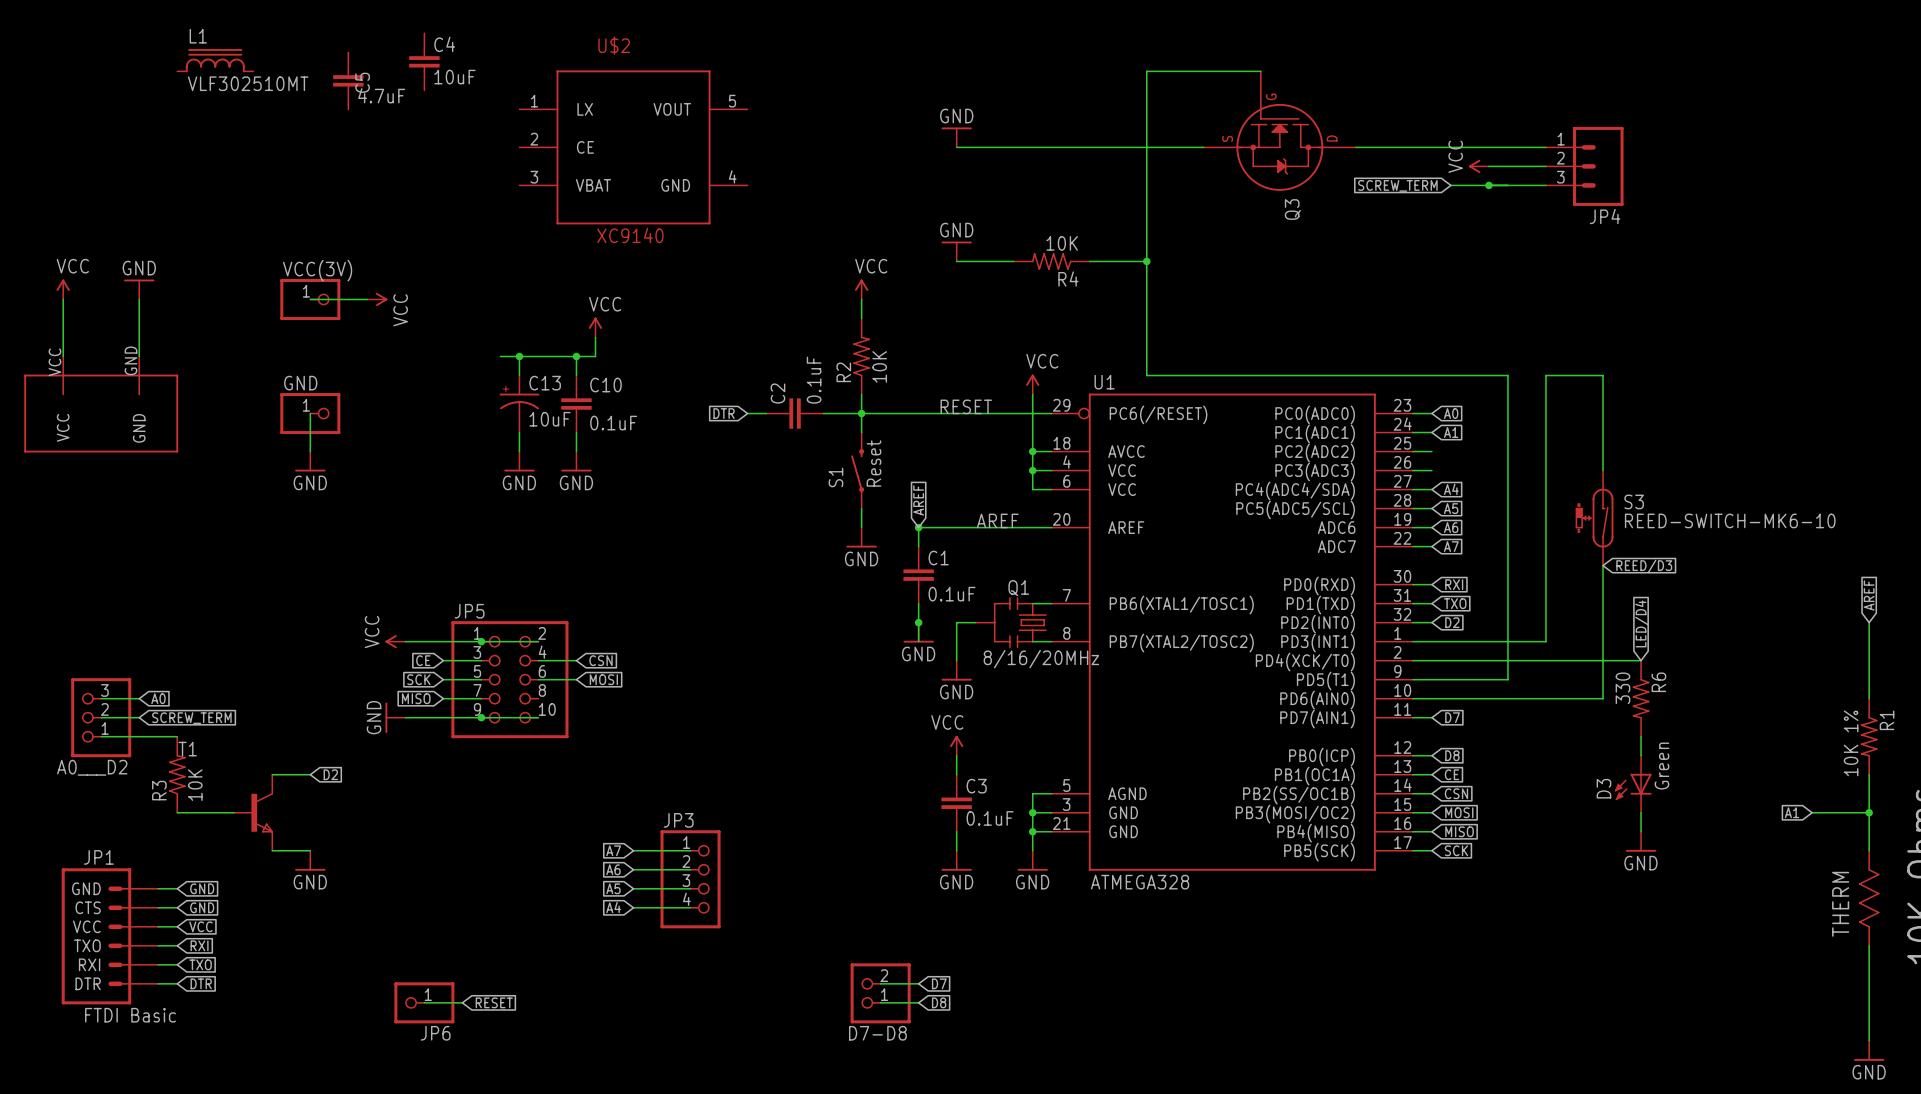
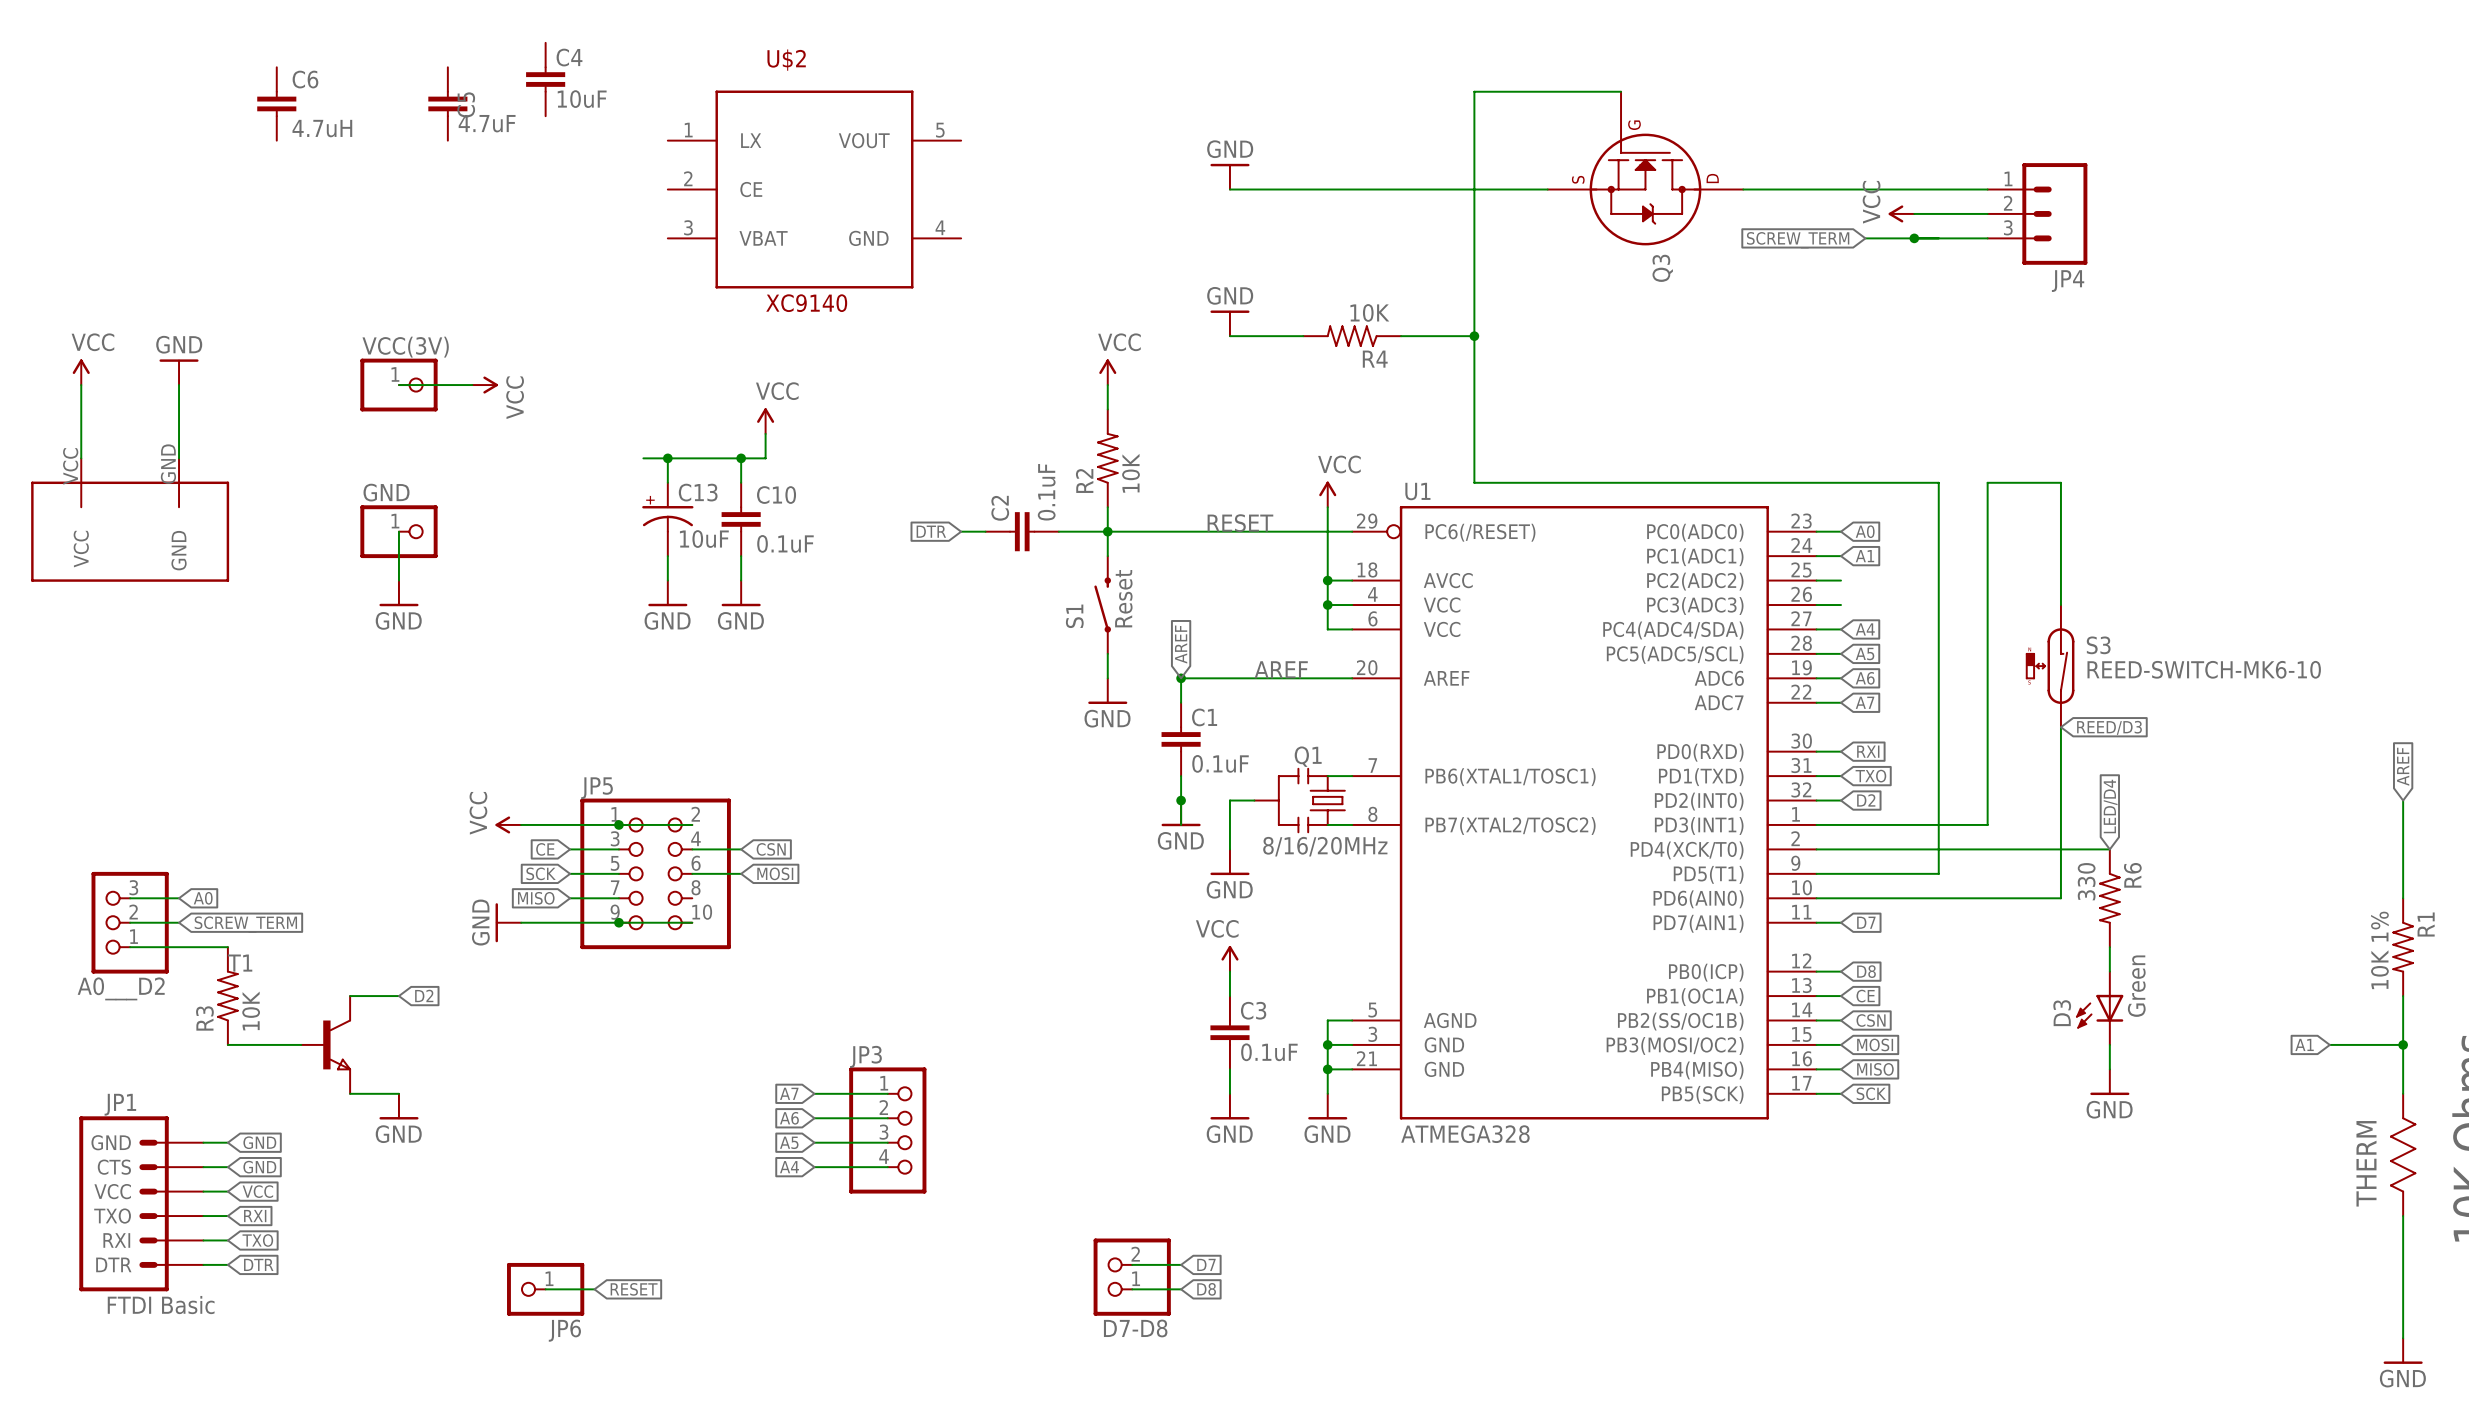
L1: VLF302510MT (215, 60) -> none
C6: none -> 4.7uH (276, 103)

